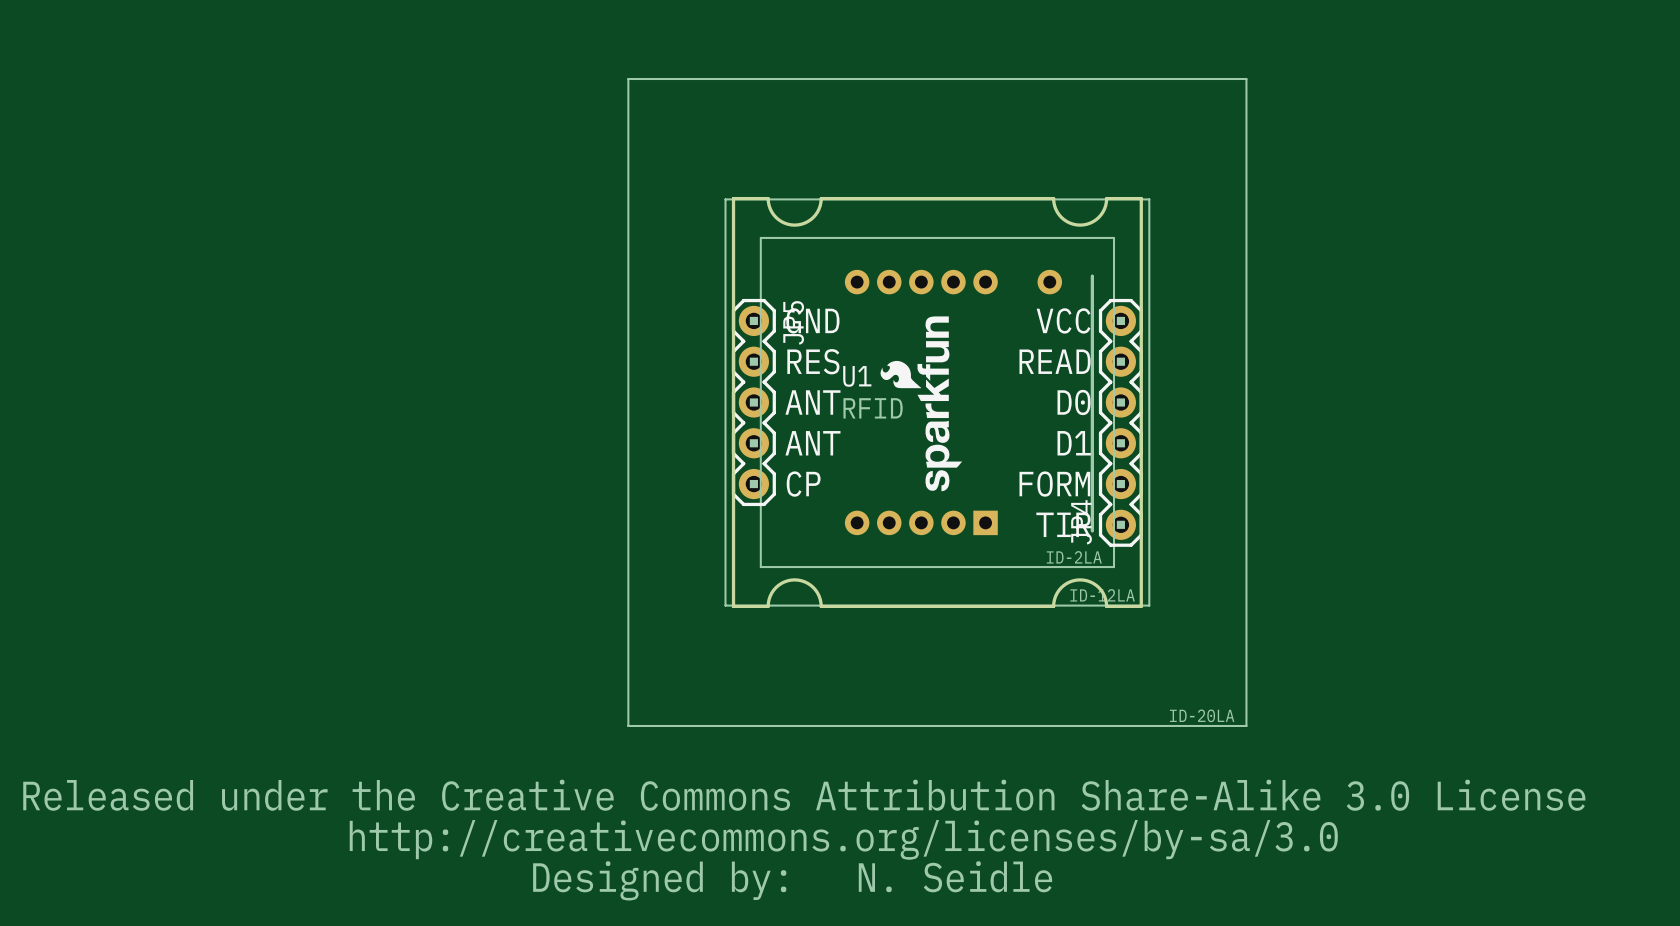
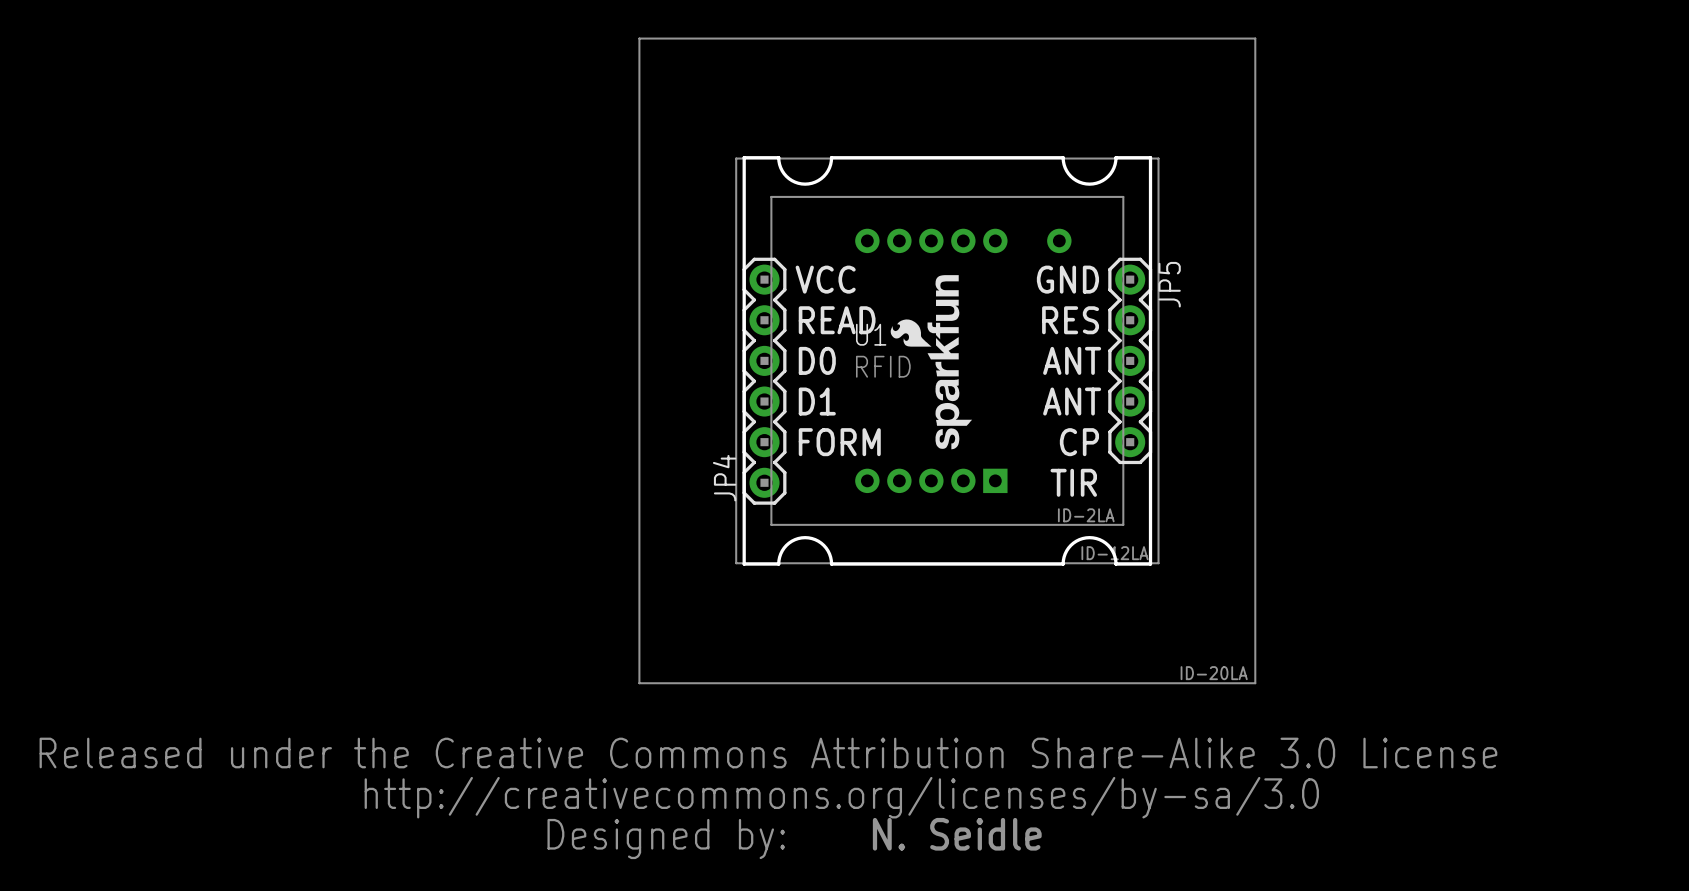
line: (1092, 276) (1092, 530) -> none
text position: GND (812, 320) -> GND (1067, 279)
text position: VCC (1063, 320) -> VCC (825, 279)
text position: RES (813, 361) -> RES (1070, 320)
text position: READ (1055, 361) -> READ (837, 320)
JP5 position: (753, 402) -> (1130, 360)
text: ANT (812, 402) -> none
text: none -> ANT (1072, 360)
text position: D0 (1074, 402) -> D0 (817, 360)
JP4 position: (1120, 422) -> (764, 381)
text: ANT (812, 443) -> none
text: none -> ANT (1072, 401)
text position: D1 (1074, 443) -> D1 (817, 401)
text position: CP (803, 484) -> CP (1079, 442)
text position: FORM (1054, 484) -> FORM (839, 442)

